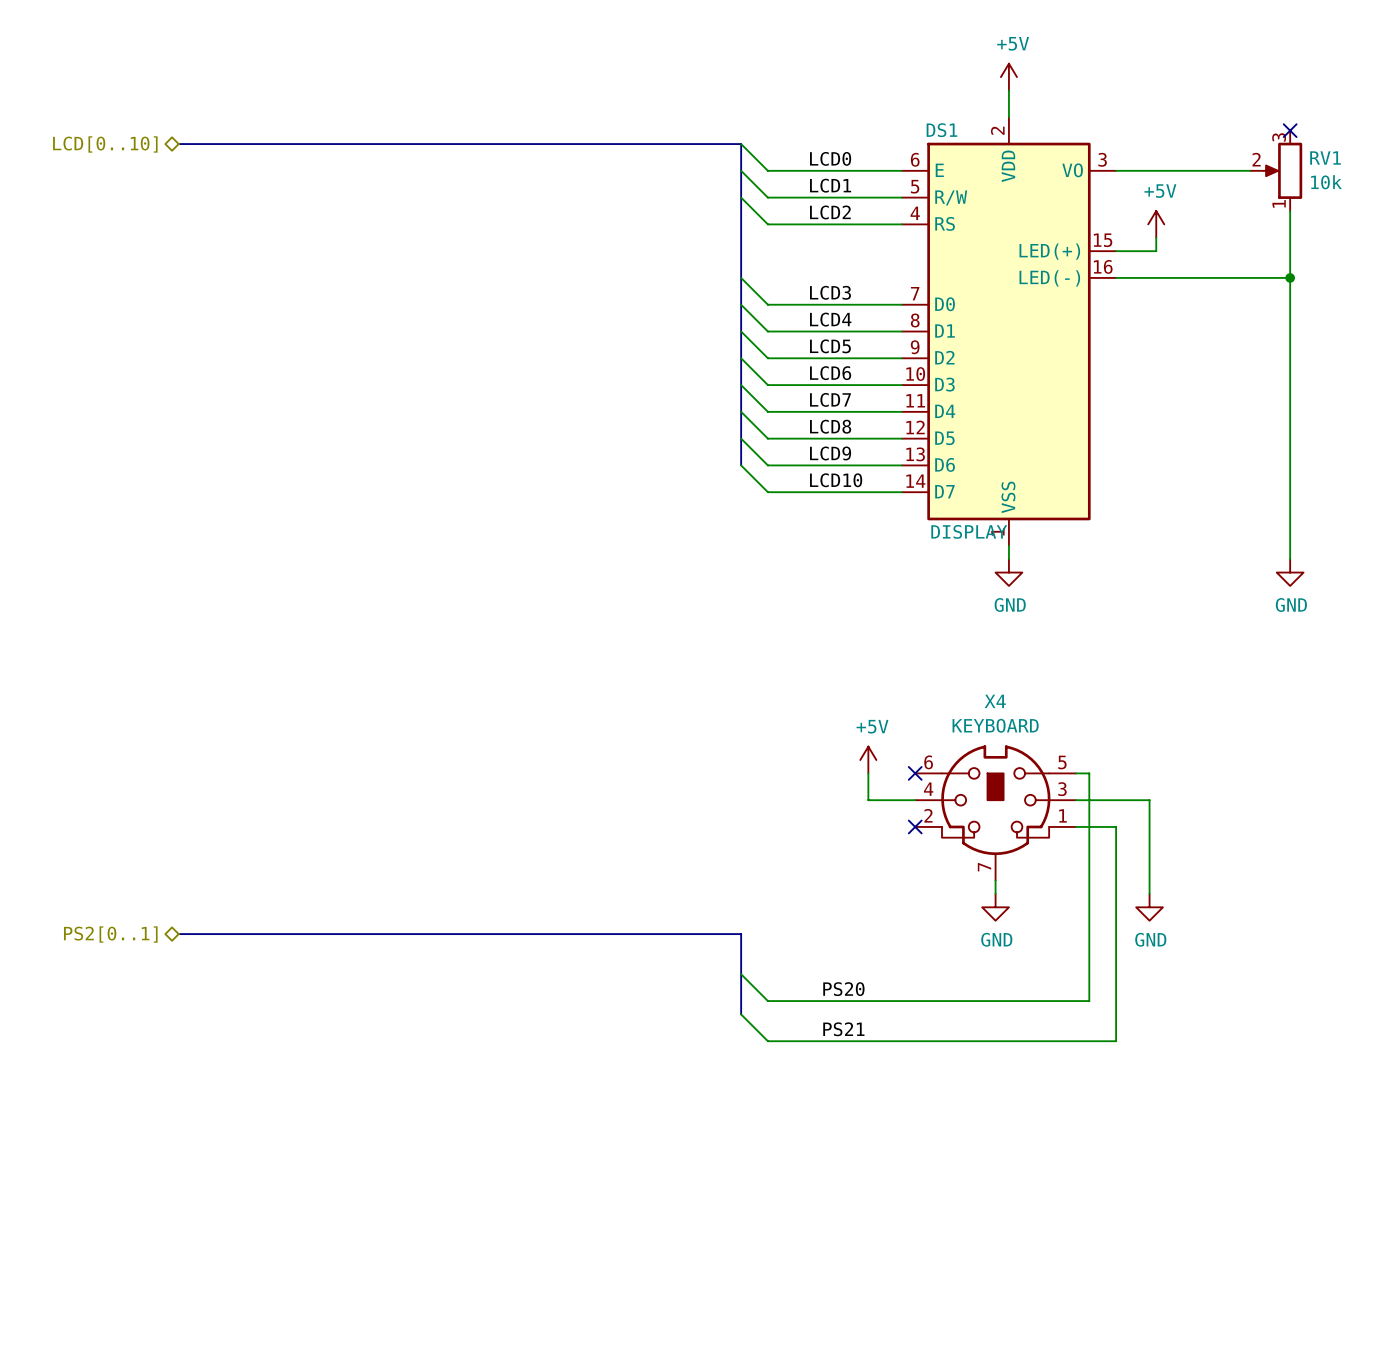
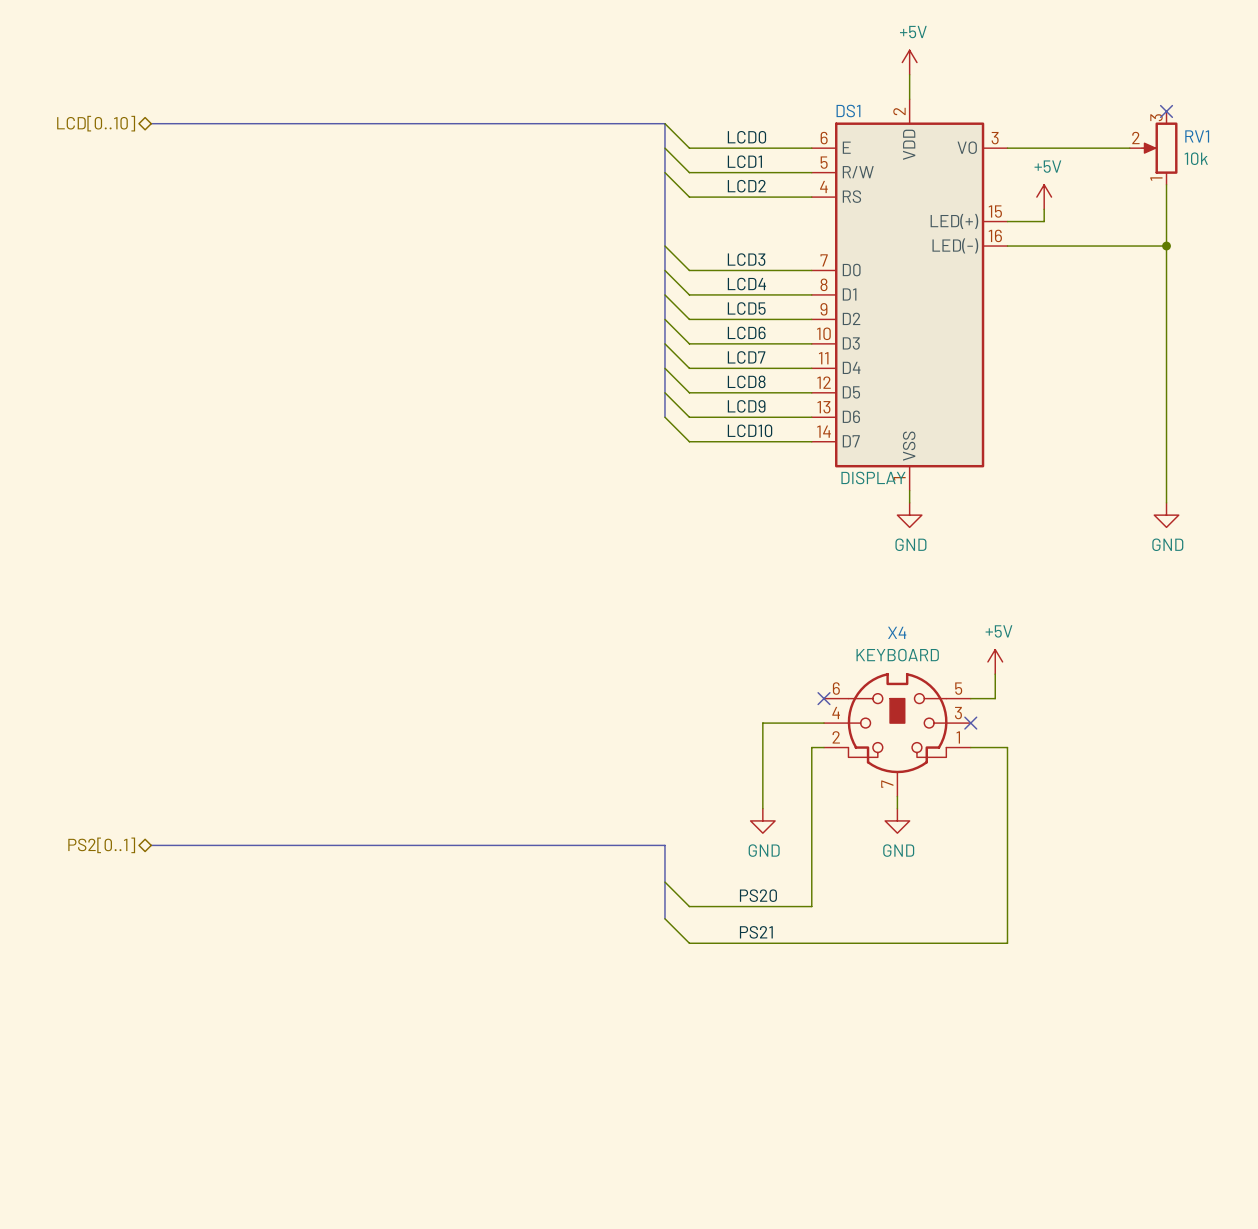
wire: none -> (995, 674) (995, 698) (983, 698)
power symbol position: +5V (868, 760) -> +5V (995, 661)
wire: (868, 773) (868, 800) -> (762, 808) (762, 723) (781, 723)
wire: (1089, 773) (1089, 1001) (901, 1001) -> (824, 747) (811, 747) (811, 906)
wire: (1075, 800) (1149, 800) (1149, 893) -> none
no-connect mark: none -> (970, 723)
no-connect mark: (915, 826) -> none
power symbol: none -> GND (762, 820)
power symbol: GND (1149, 907) -> none

